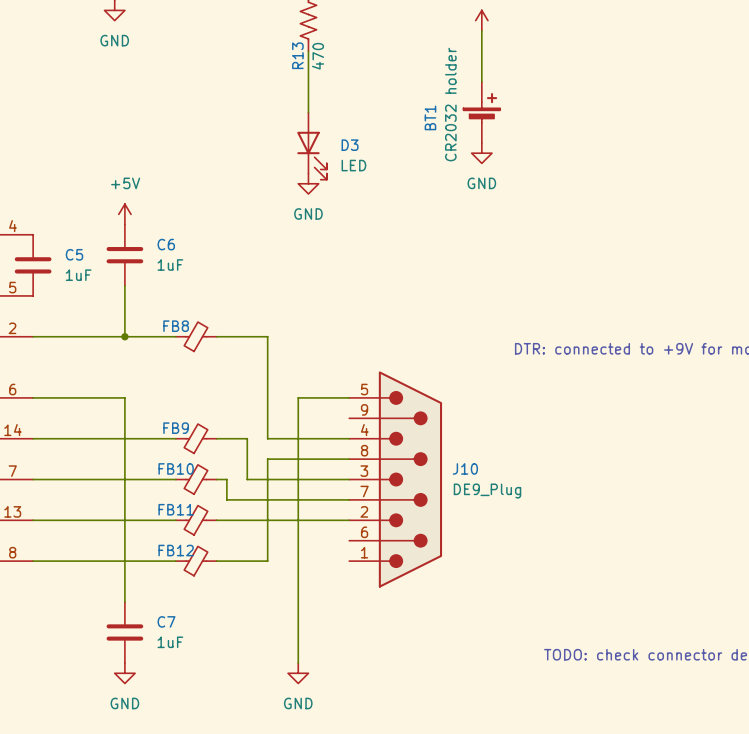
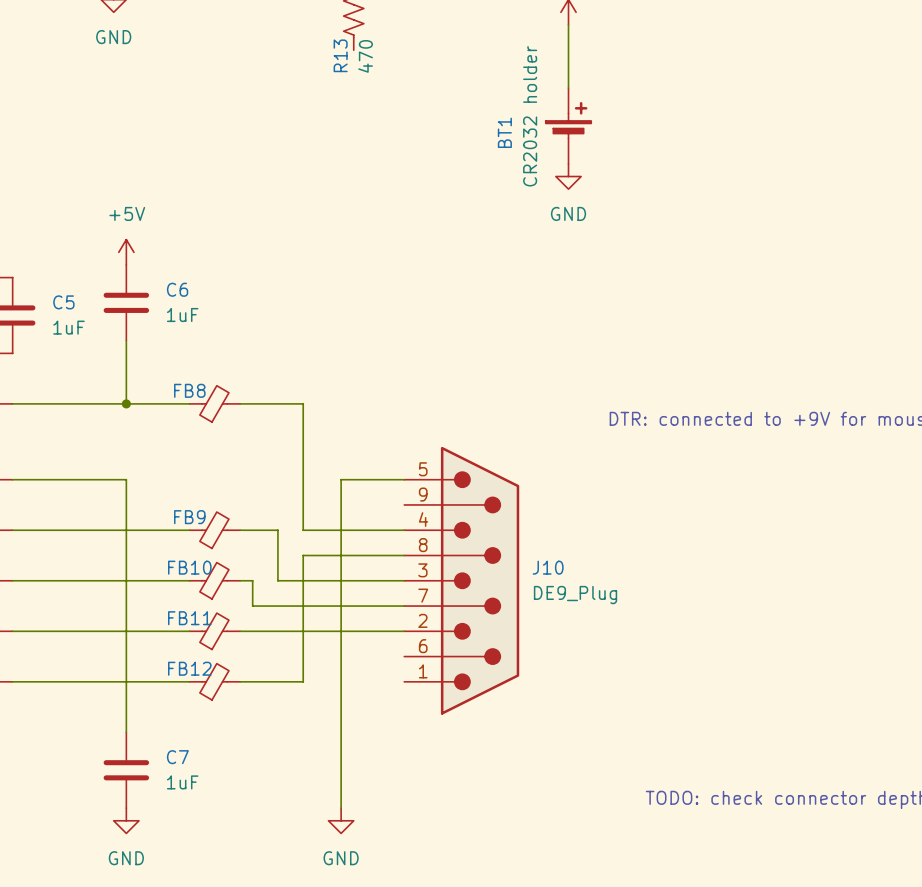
wire: (308, 51) (308, 112) -> none
D3: LED (312, 146) -> none
power symbol: GND (308, 183) -> none

